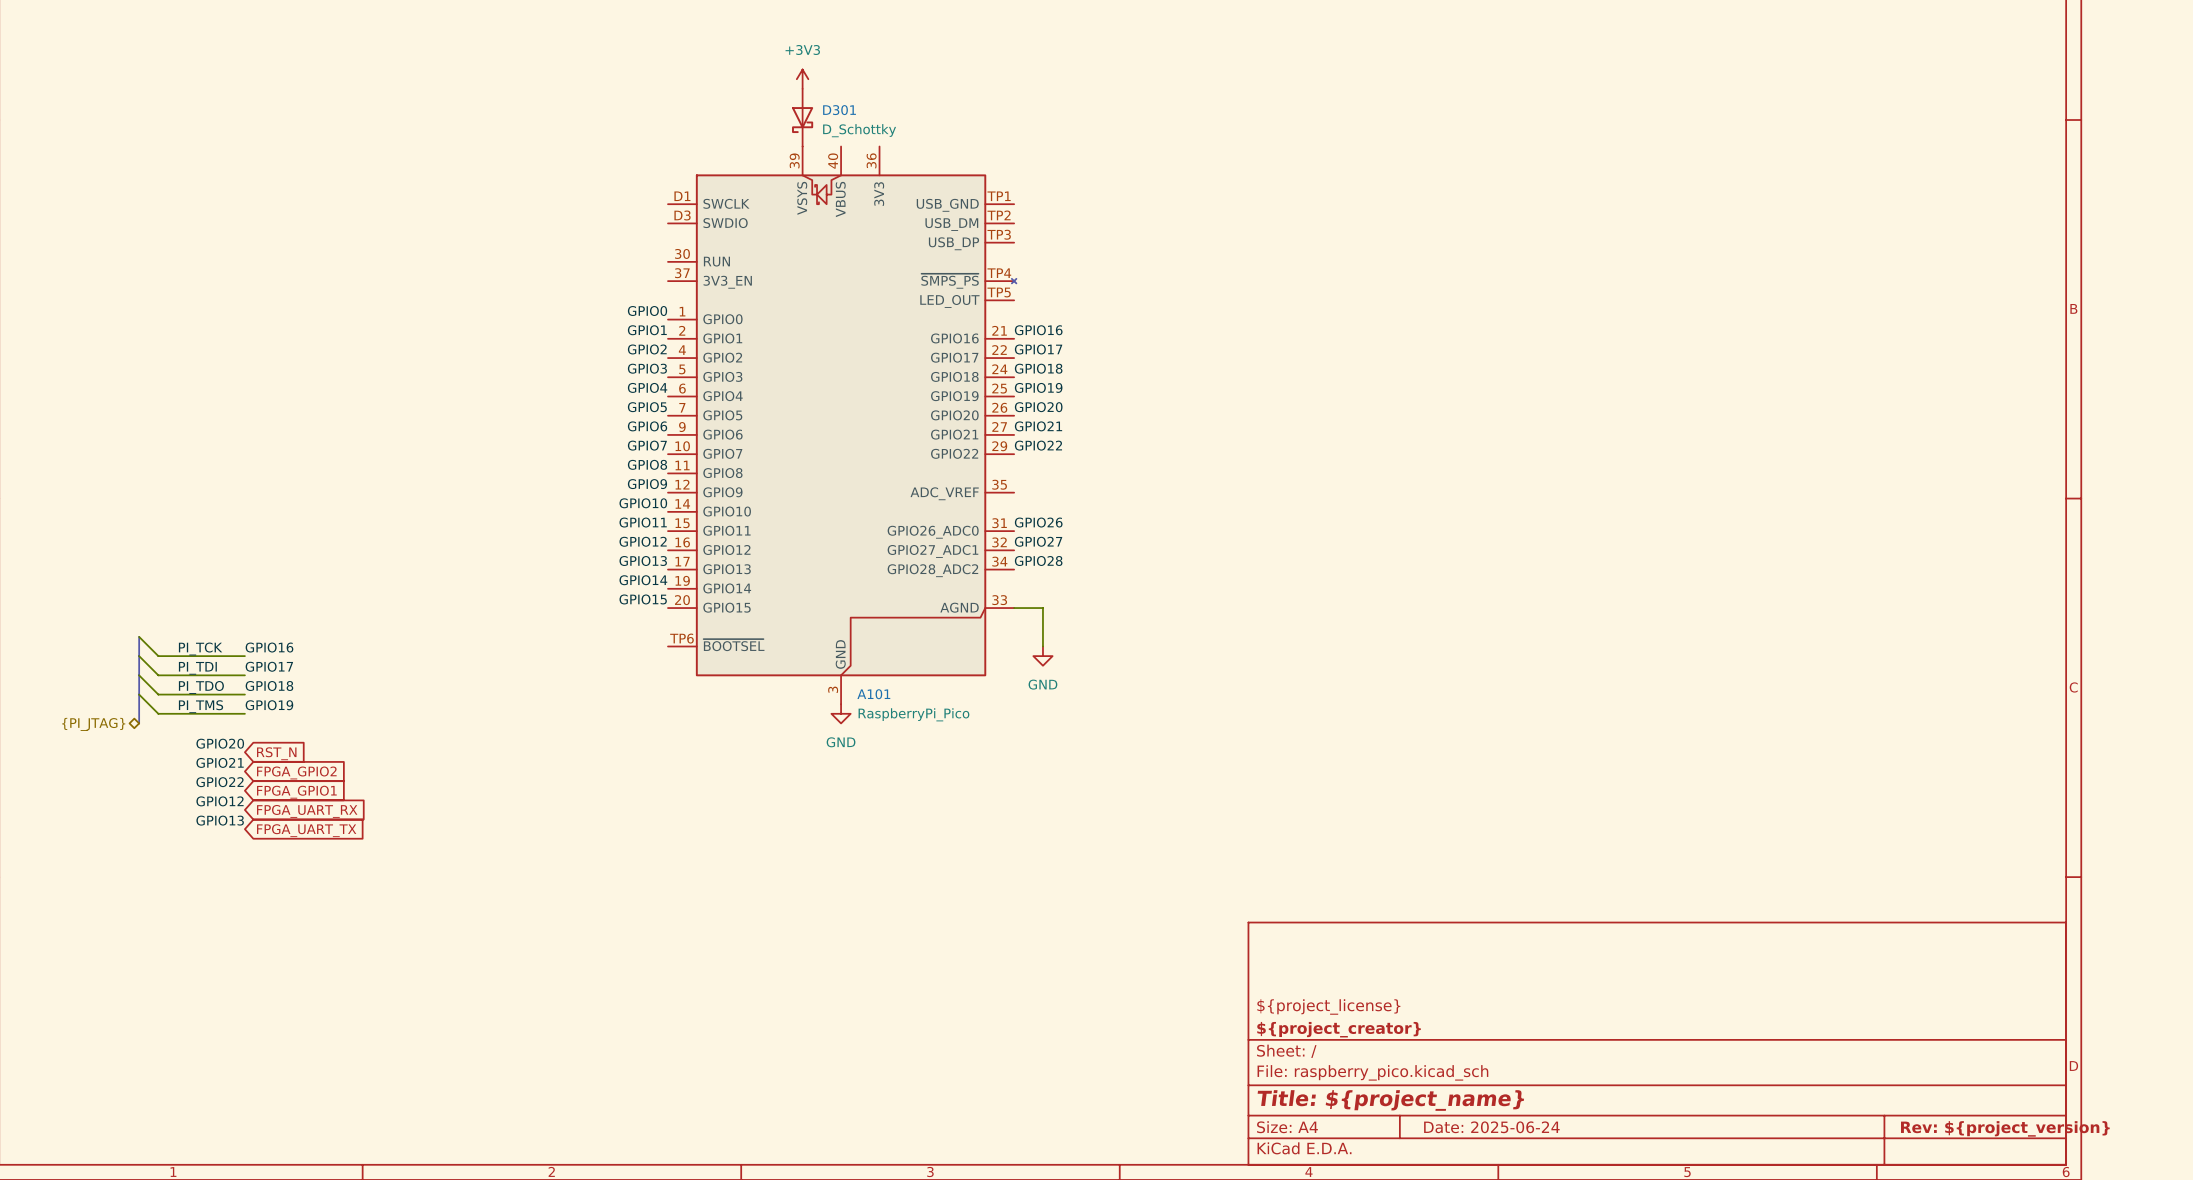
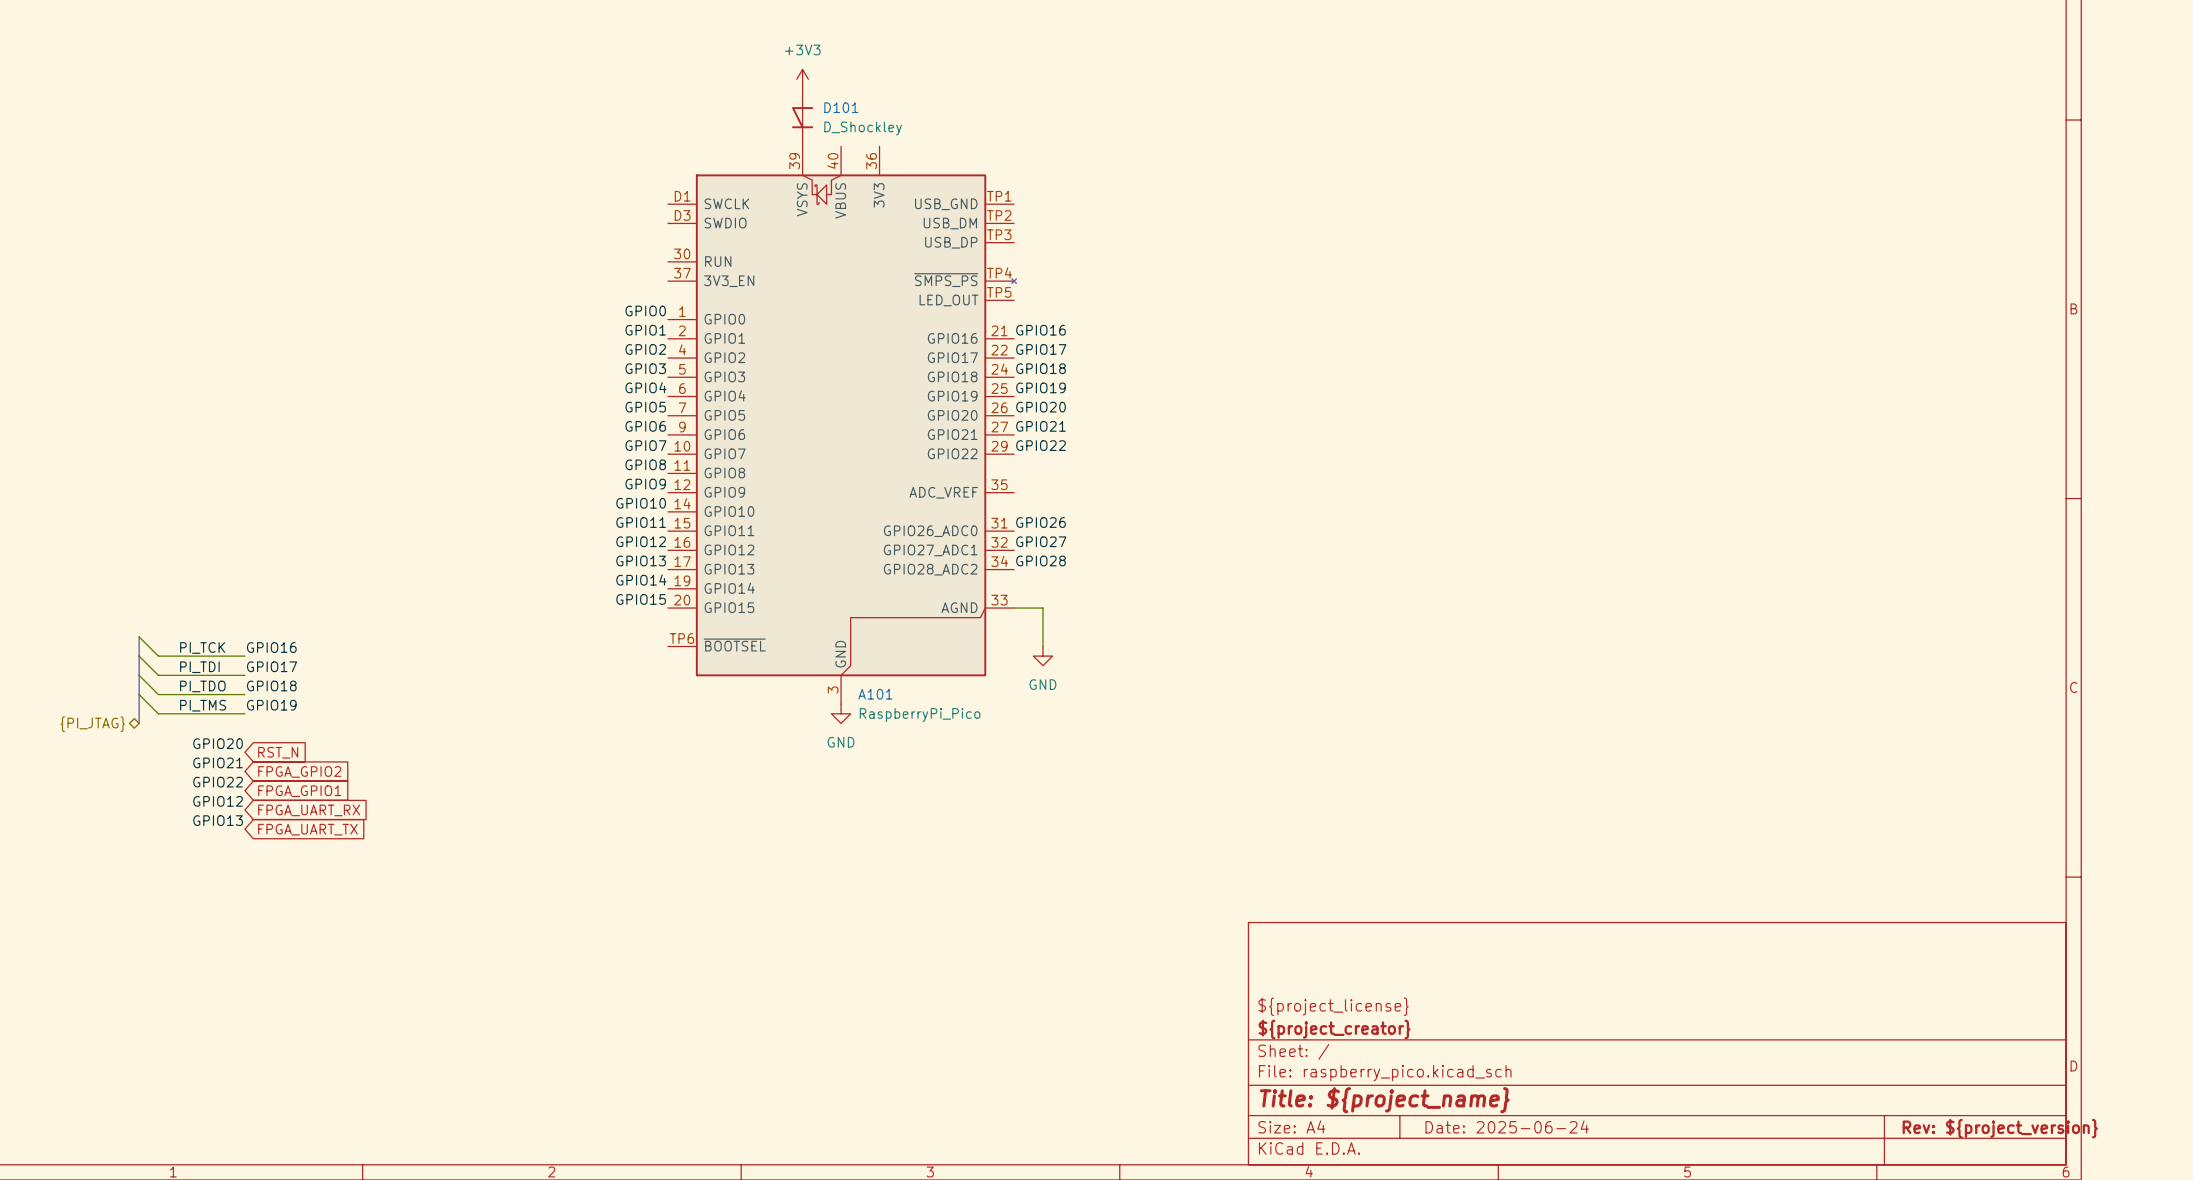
D301: D_Schottky (802, 117) -> none
D101: none -> D_Shockley (802, 117)

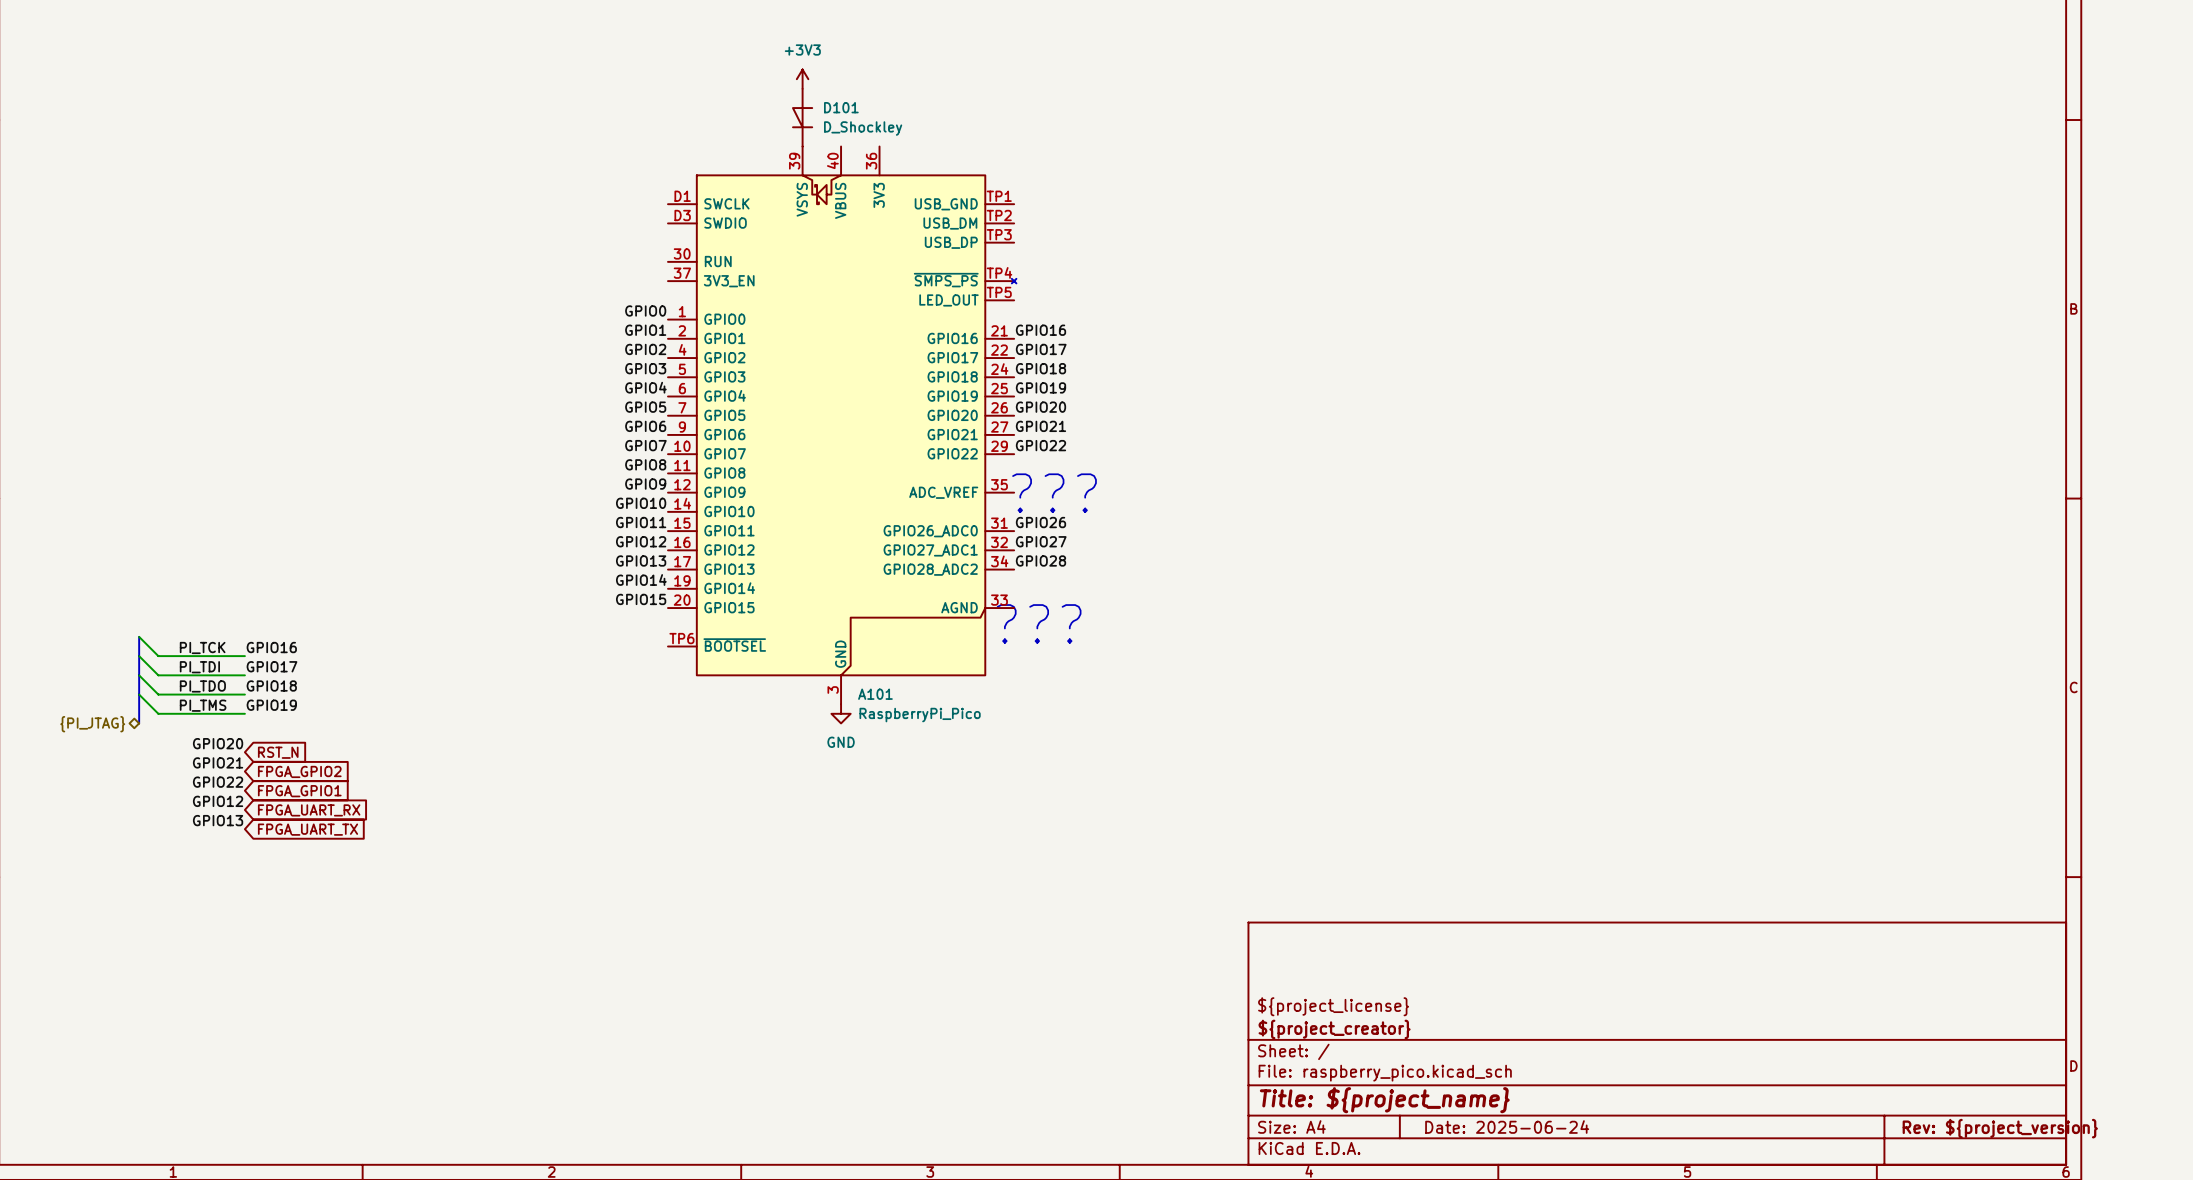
text: none -> ??? (1054, 493)
wire: (1014, 608) (1042, 608) (1042, 646) -> none
text: none -> ??? (1039, 623)
power symbol: GND (1042, 656) -> none

